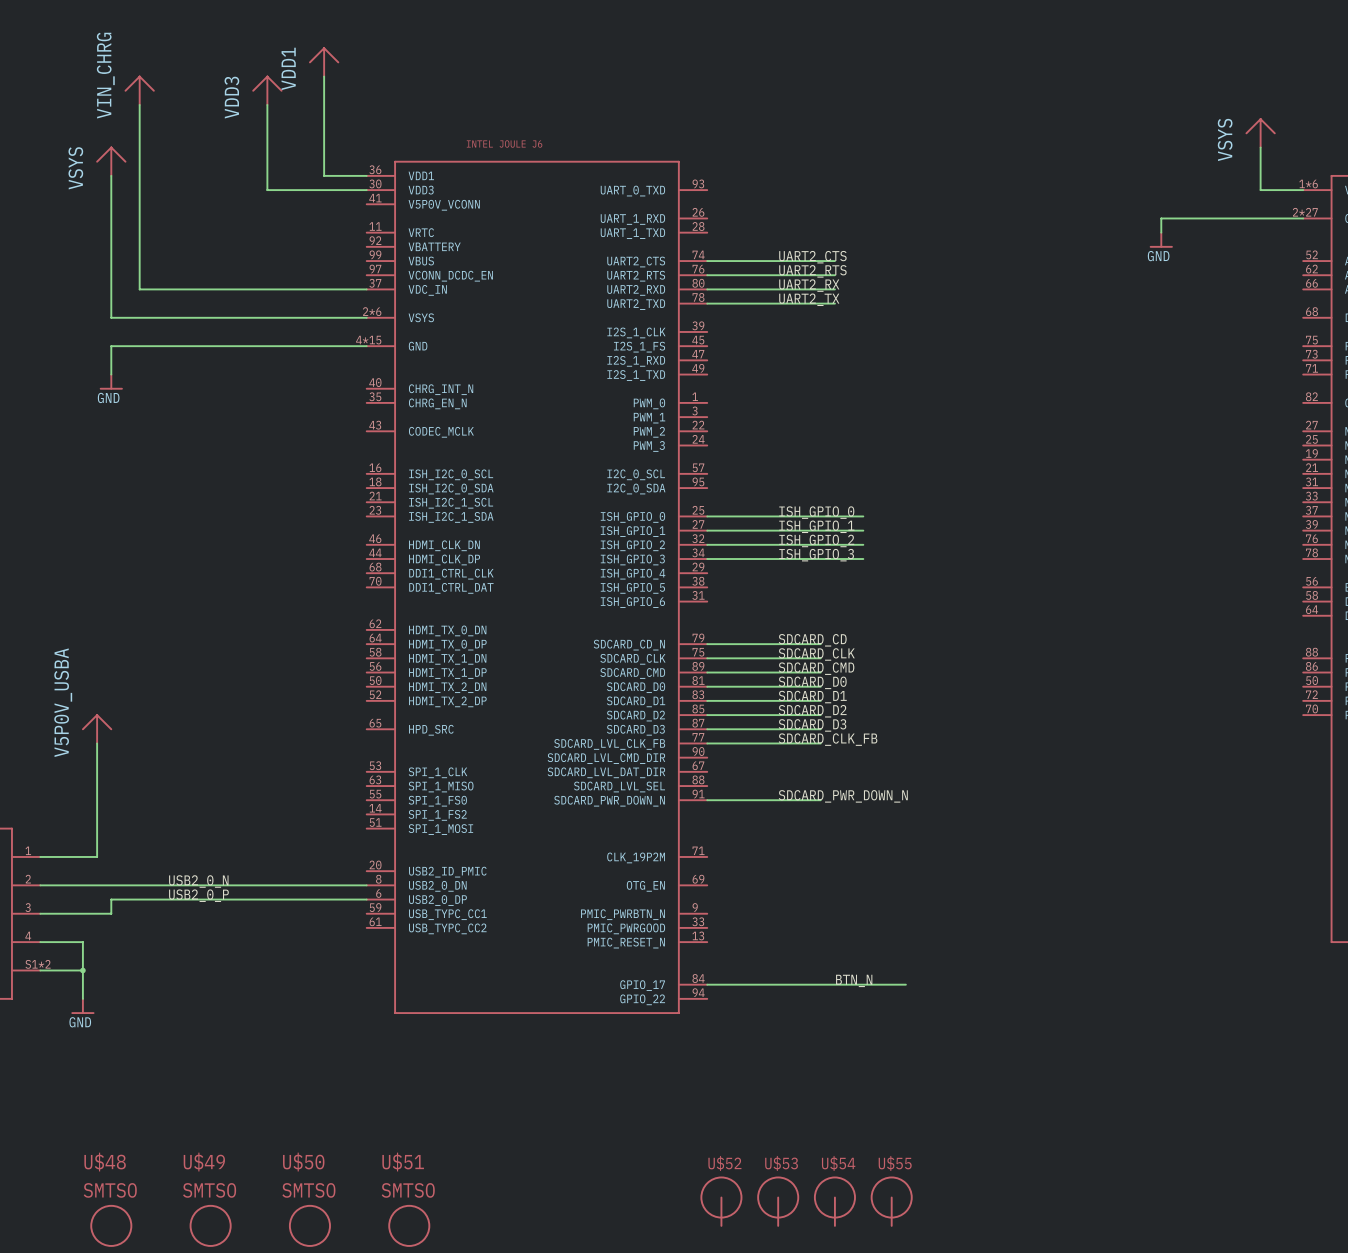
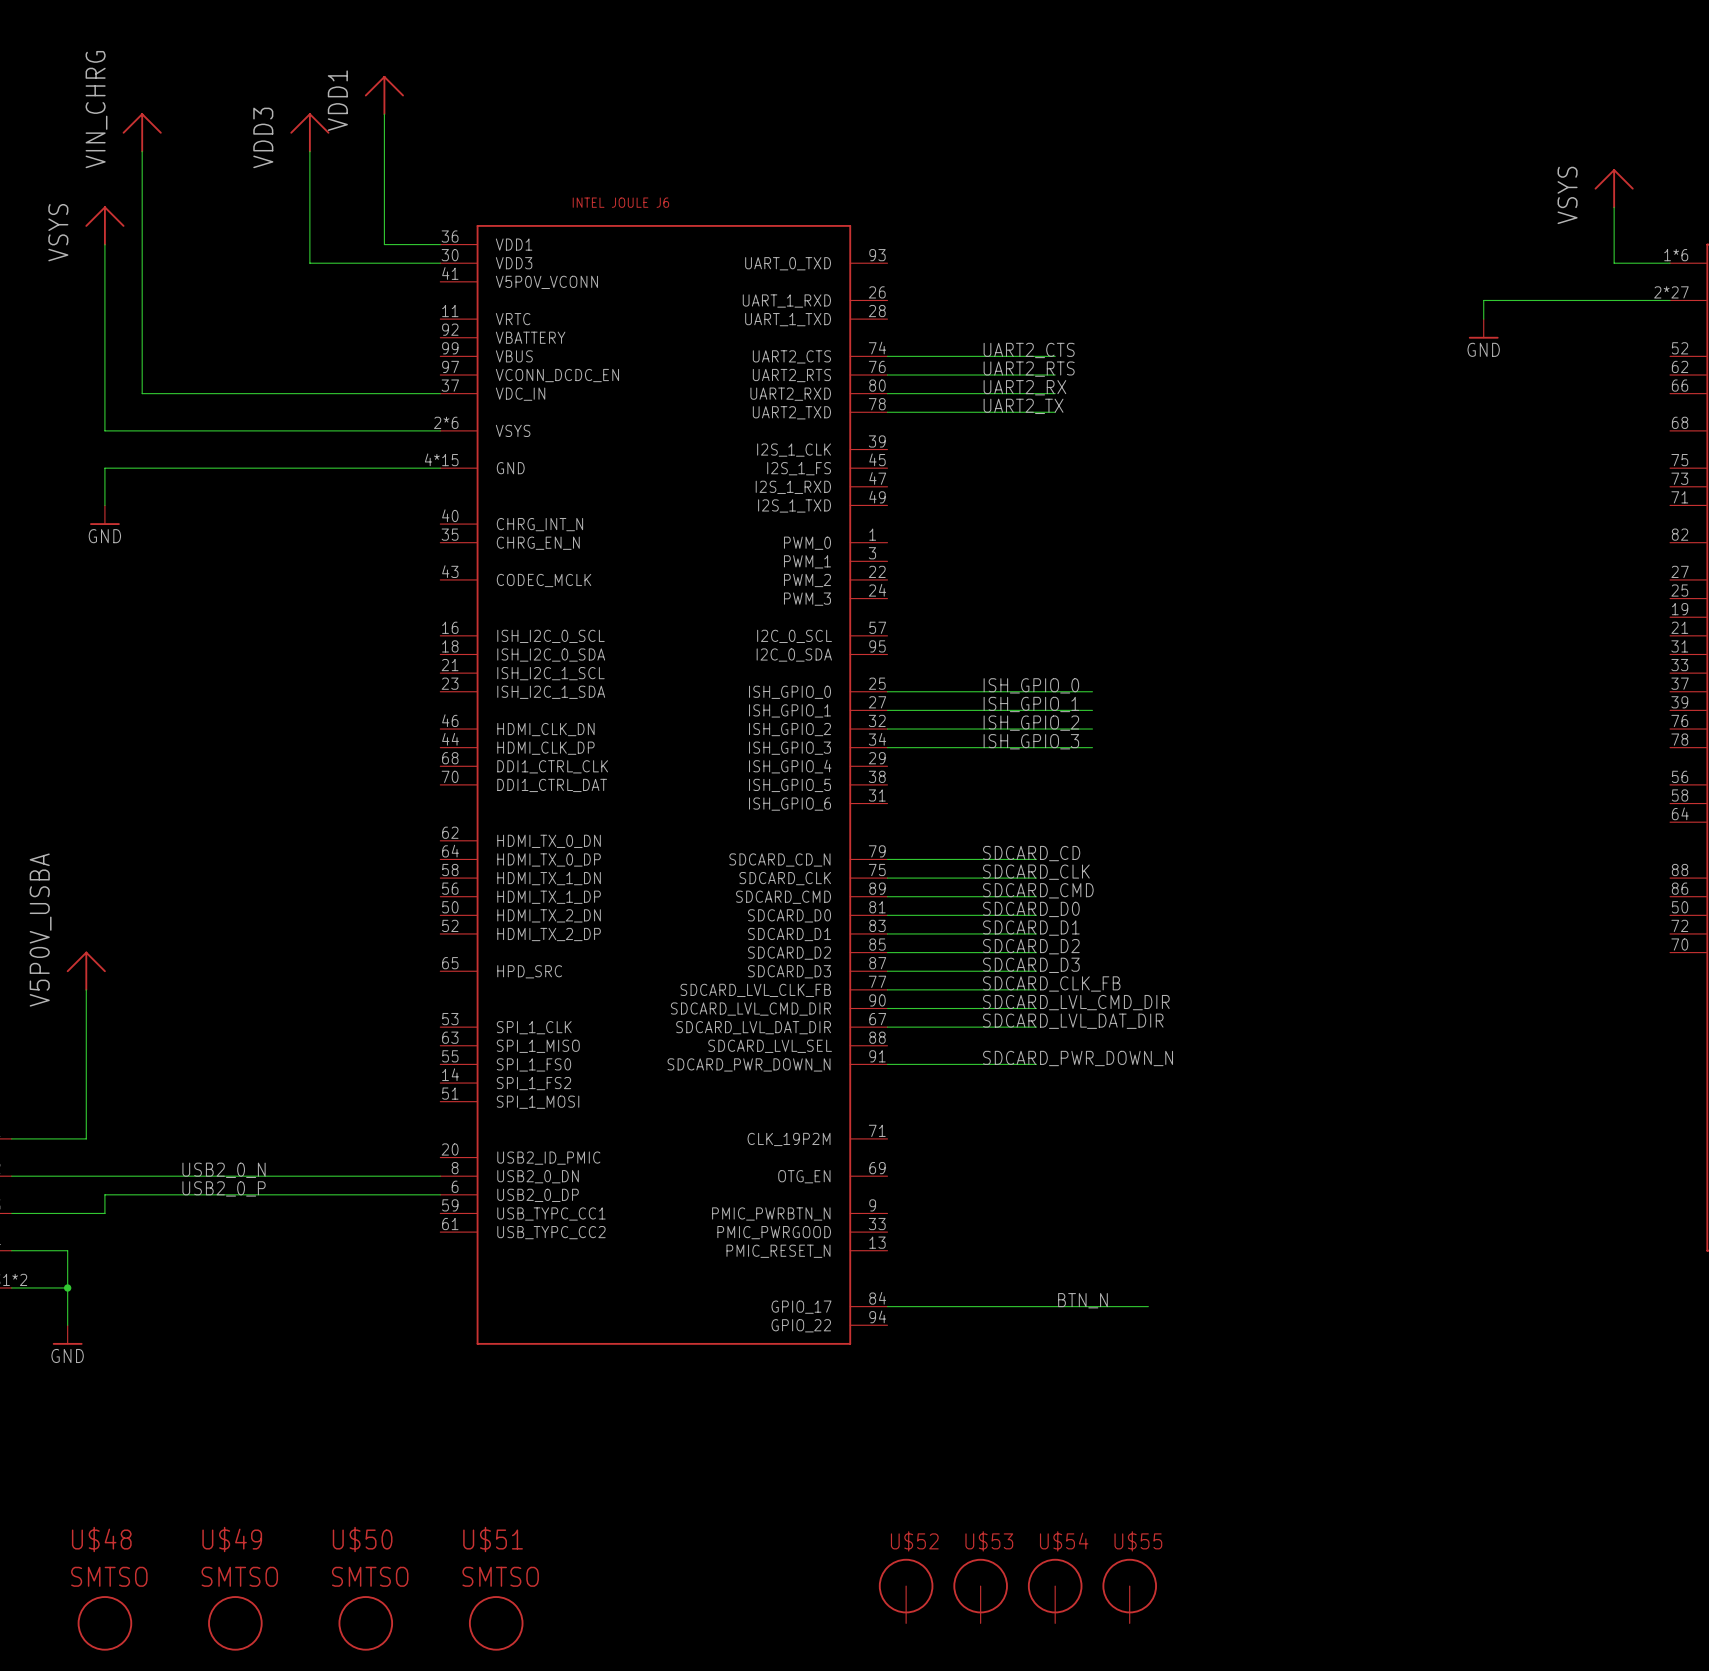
label: none -> SDCARD_LVL_CMD_DIR (1076, 1002)
wire: none -> (887, 1008) (1036, 1008)
label: none -> SDCARD_LVL_DAT_DIR (1073, 1021)
wire: none -> (887, 1027) (1036, 1027)

